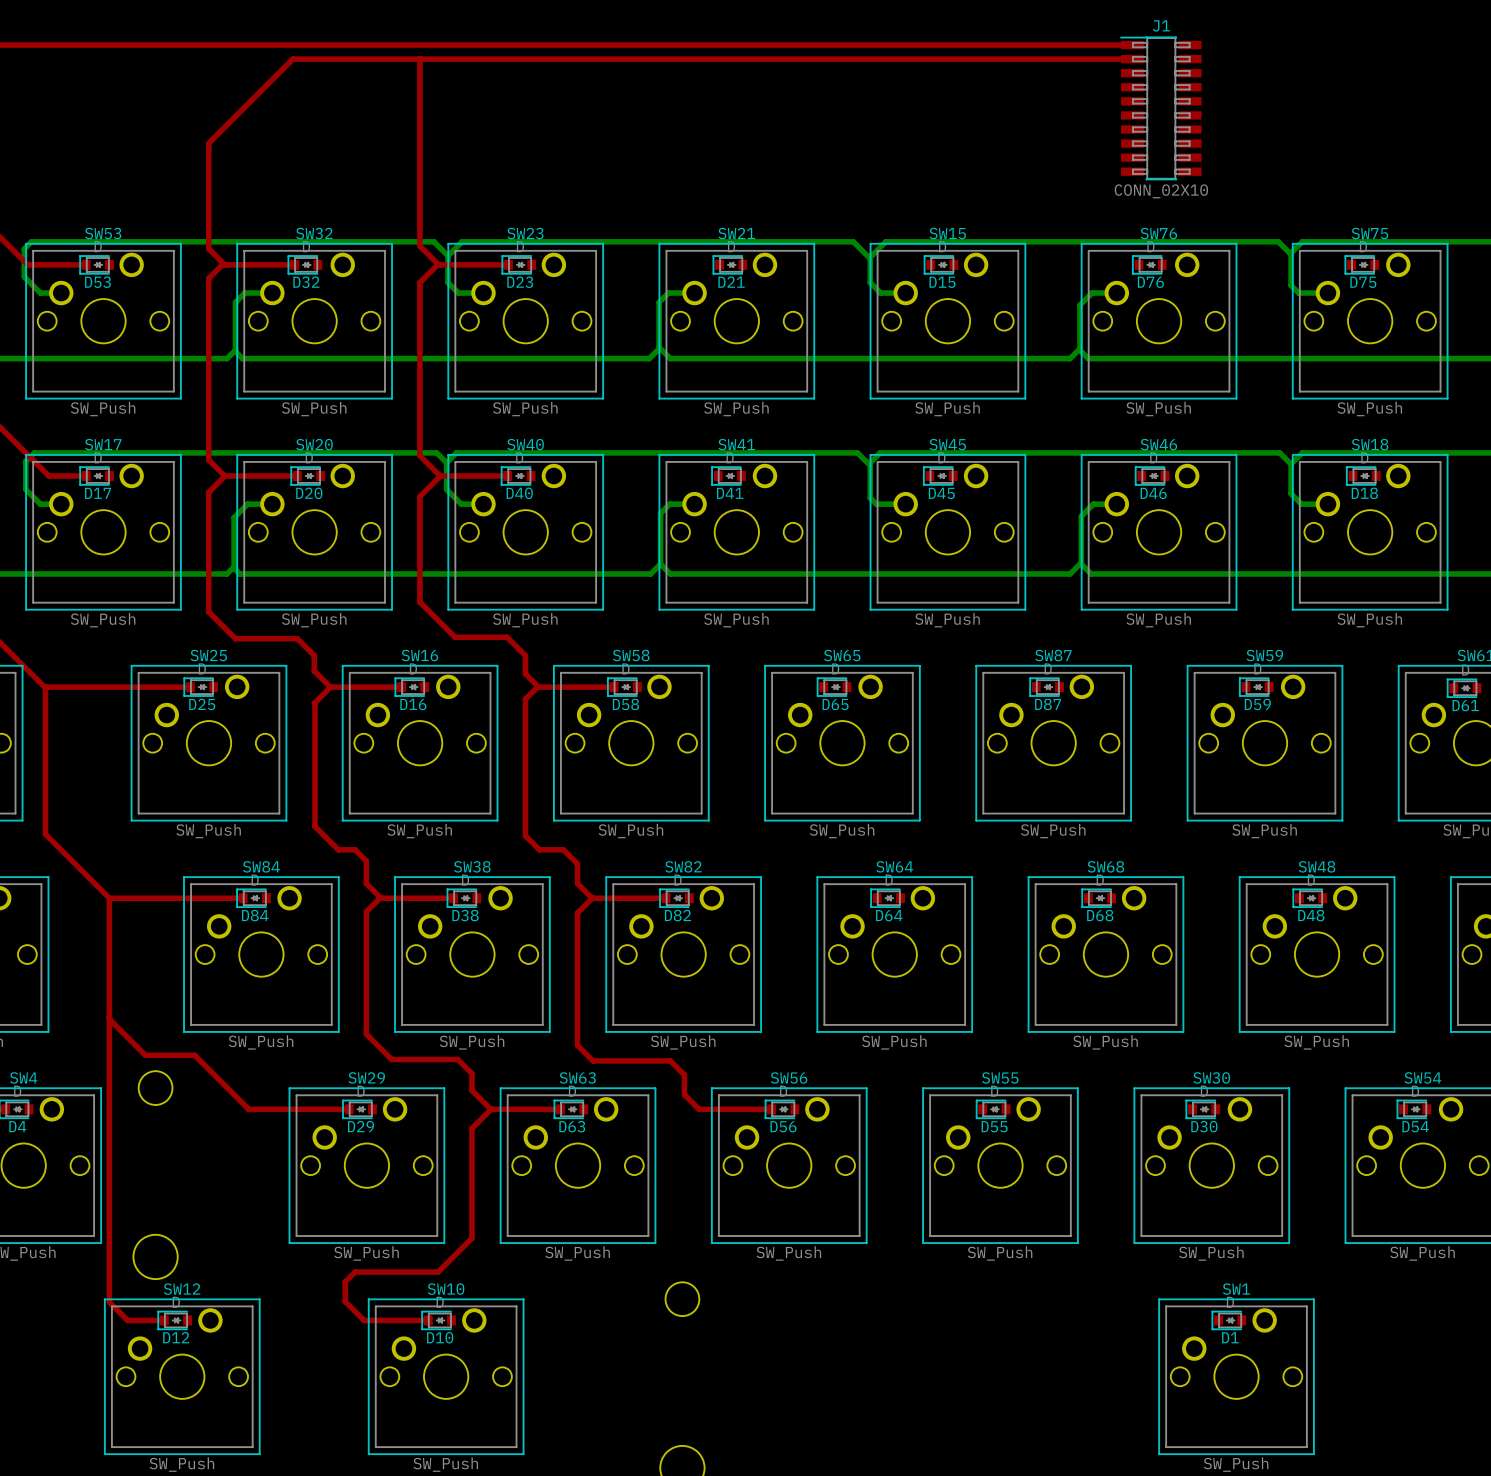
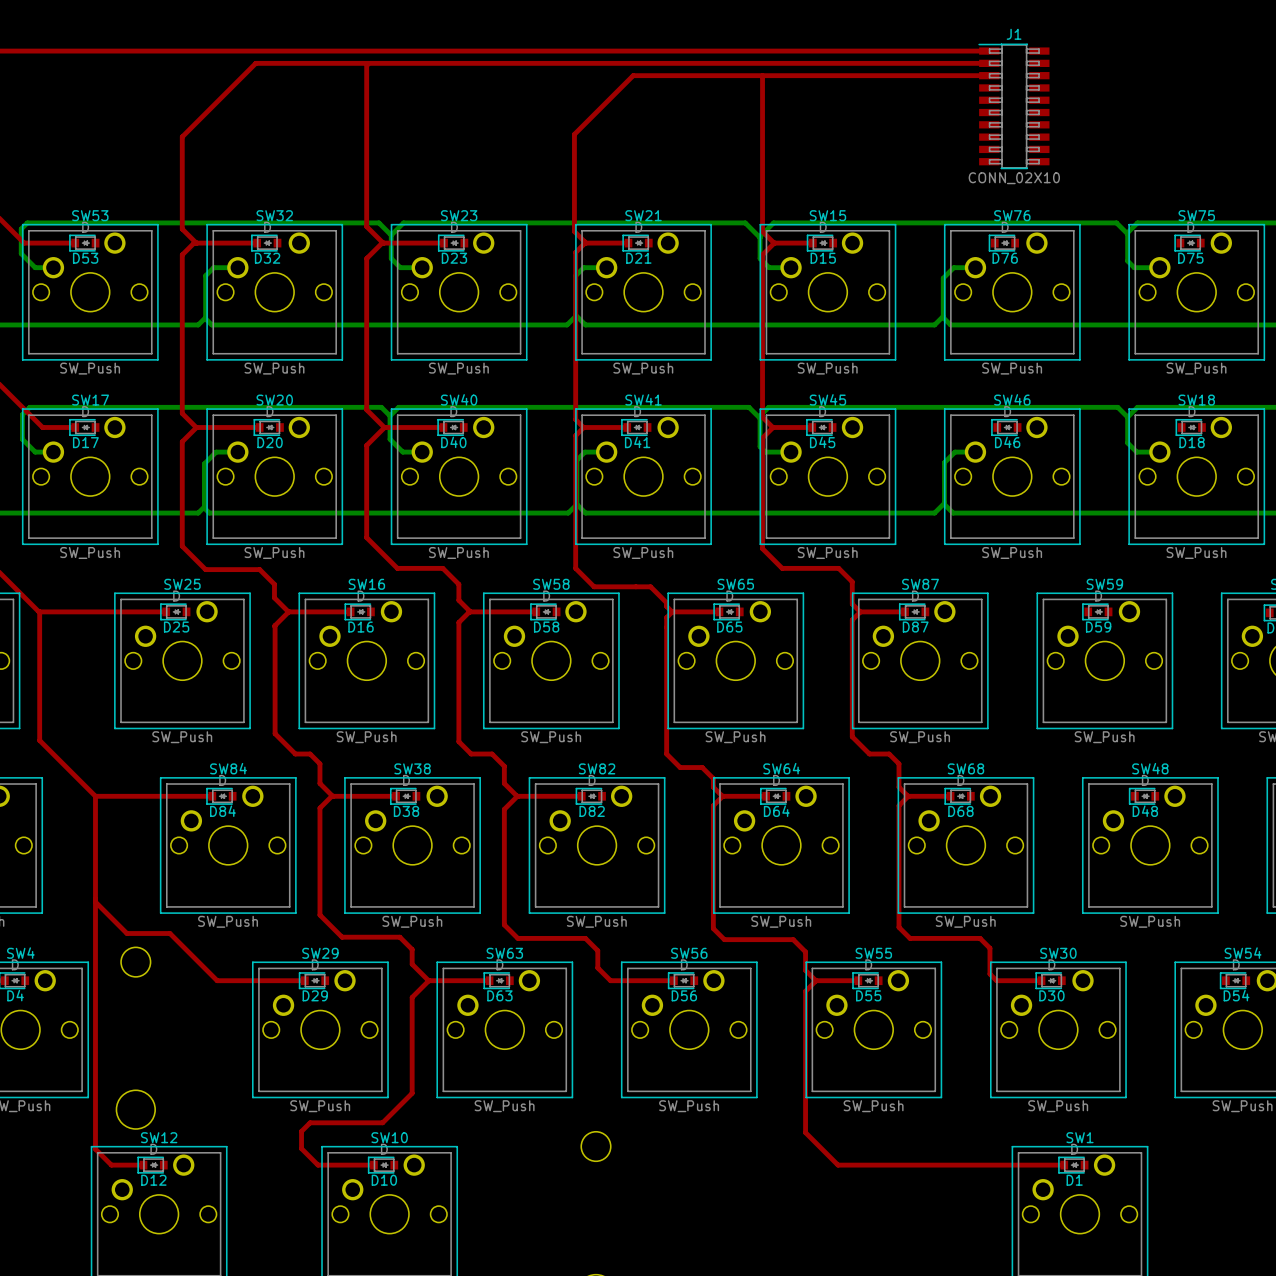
top track: none -> (762, 75) (762, 231) (774, 243) (812, 243)
top track: none -> (989, 75) (633, 75) (574, 134) (574, 231) (585, 243) (628, 243)
top track: none -> (584, 241) (584, 243) (575, 252) (575, 419) (583, 427) (627, 427)
top track: none -> (774, 243) (762, 254) (762, 417) (772, 427)
top track: none -> (583, 427) (575, 435) (575, 568) (594, 586) (650, 586) (666, 602) (666, 606) (672, 611) (719, 611)
top track: none -> (772, 427) (762, 438) (762, 548) (782, 568) (838, 568) (852, 581) (852, 604) (860, 611)
top track: none -> (772, 427) (812, 427)
top track: none -> (672, 611) (666, 617) (666, 754) (680, 767) (702, 767) (713, 778) (713, 787) (722, 796) (766, 796)
top track: none -> (860, 611) (852, 620) (852, 736) (869, 754) (889, 754) (898, 763) (898, 787) (908, 796) (950, 796)
top track: none -> (860, 611) (905, 611)
top track: none -> (722, 796) (713, 805) (713, 928) (724, 939) (793, 939) (805, 951) (805, 970) (815, 980)
top track: none -> (908, 796) (898, 805) (898, 927) (910, 938) (980, 938) (989, 948) (989, 974) (996, 980) (1041, 980)
top track: none -> (815, 980) (858, 980)
top track: none -> (815, 980) (805, 991) (805, 1132) (838, 1165) (1064, 1165)

